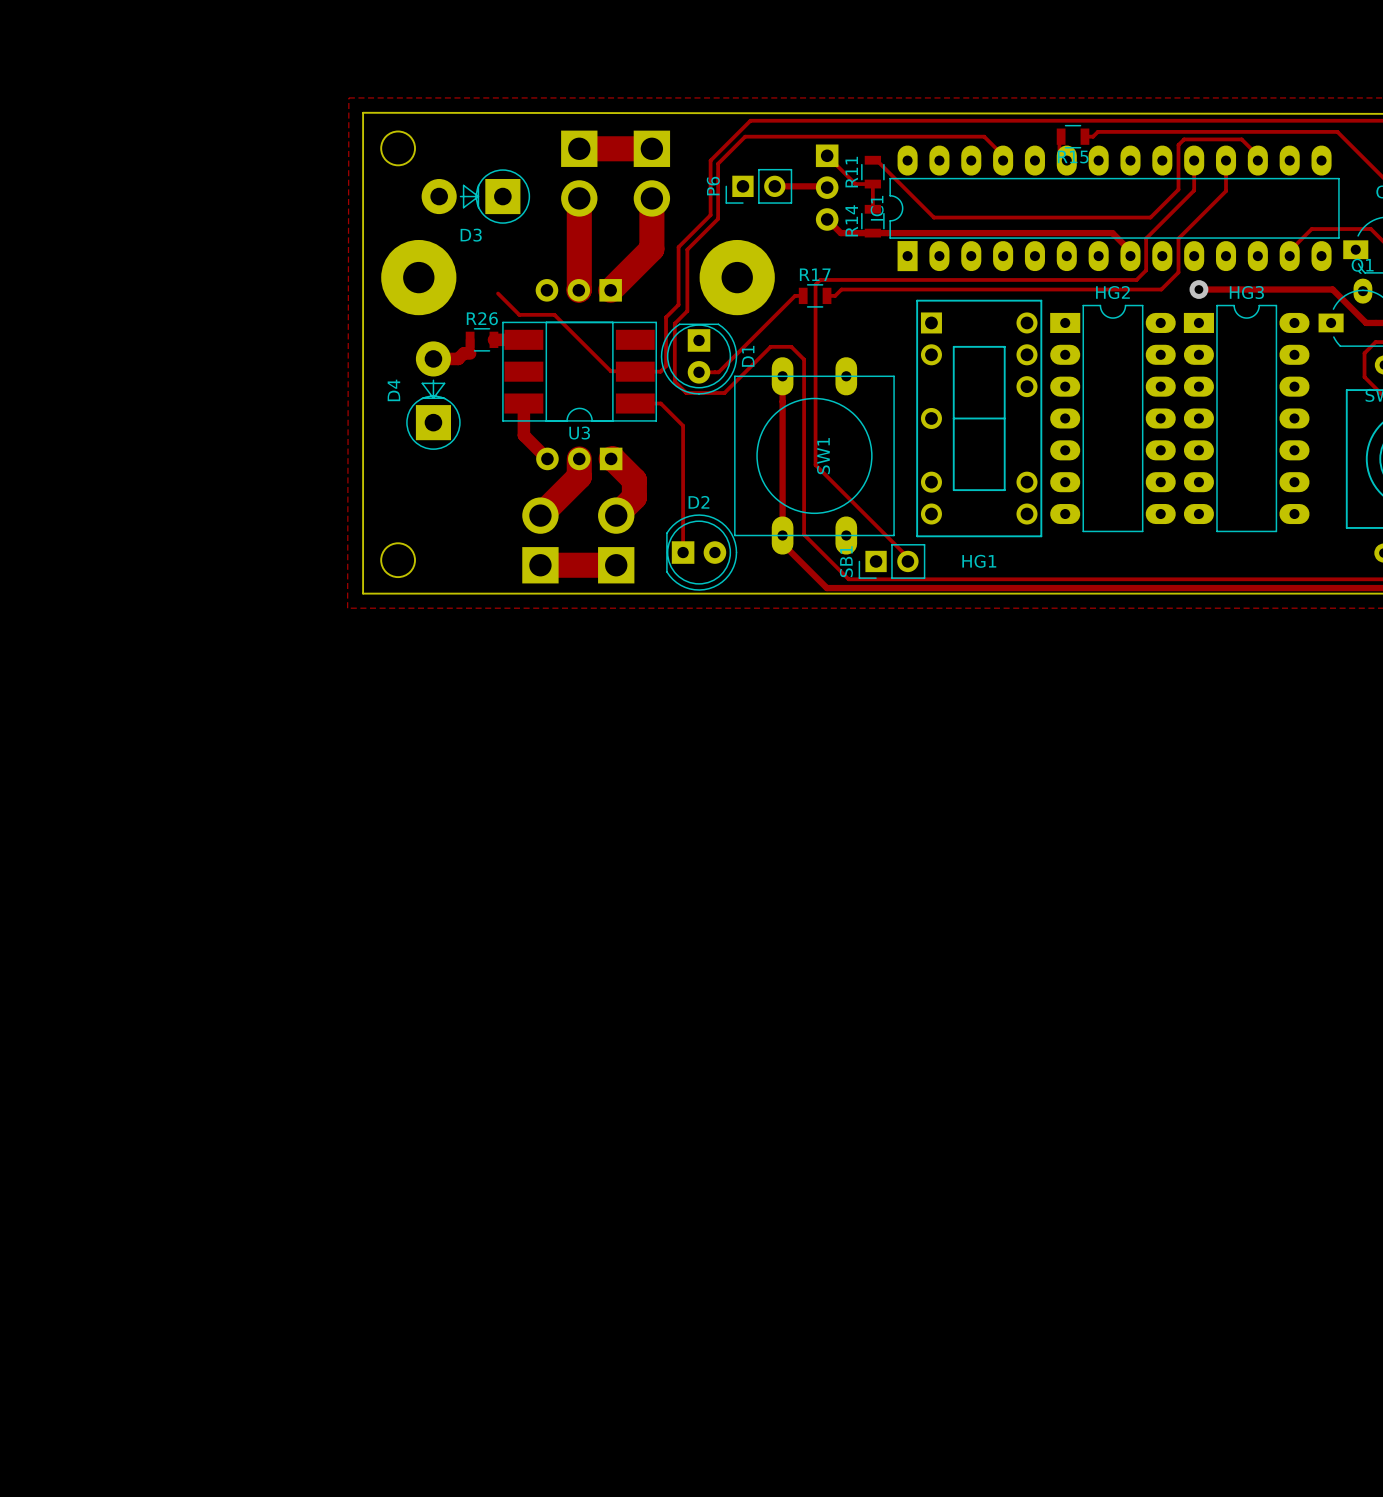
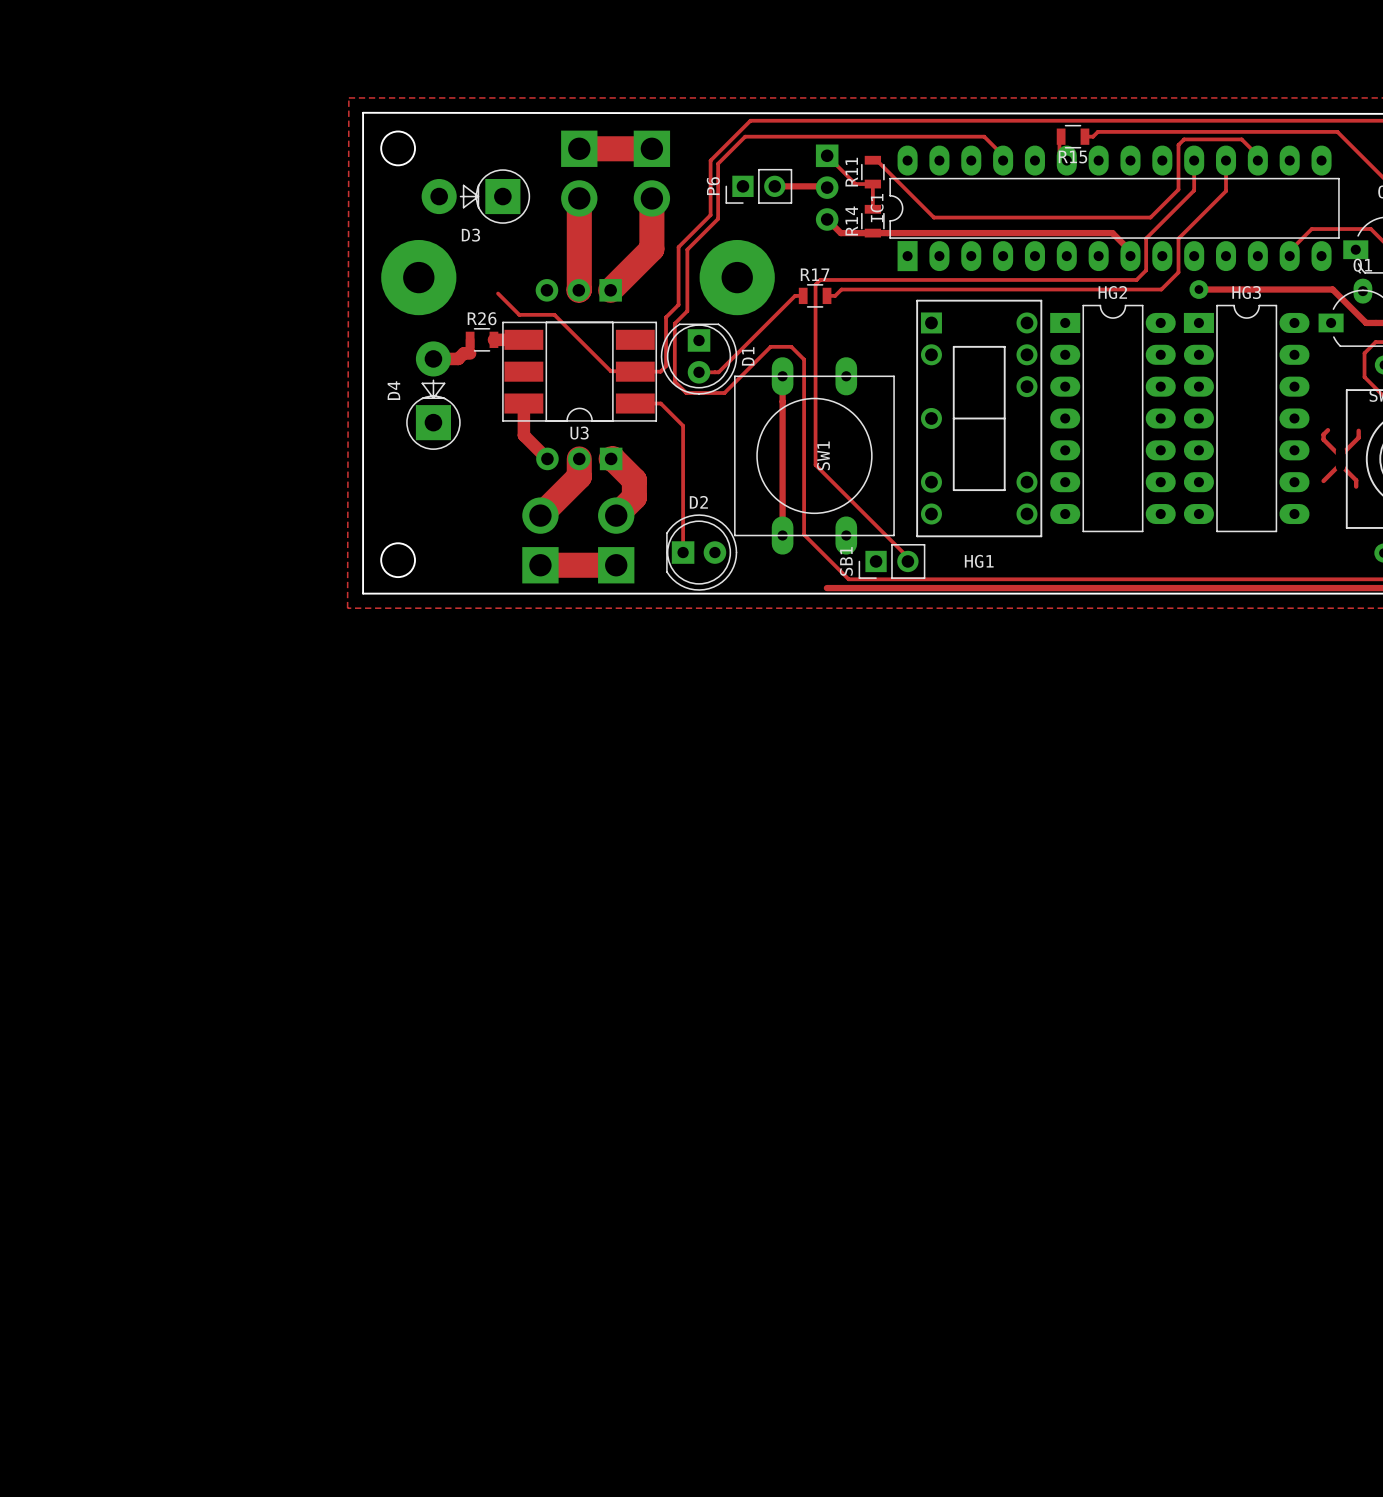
track: none -> (1327, 430) (1323, 434) (1323, 439) (1340, 456)
track: none -> (1358, 430) (1358, 437) (1340, 455) (1340, 464) (1356, 480) (1356, 486)
track: none -> (1340, 464) (1323, 480)
track: (782, 543) (826, 588) -> none

